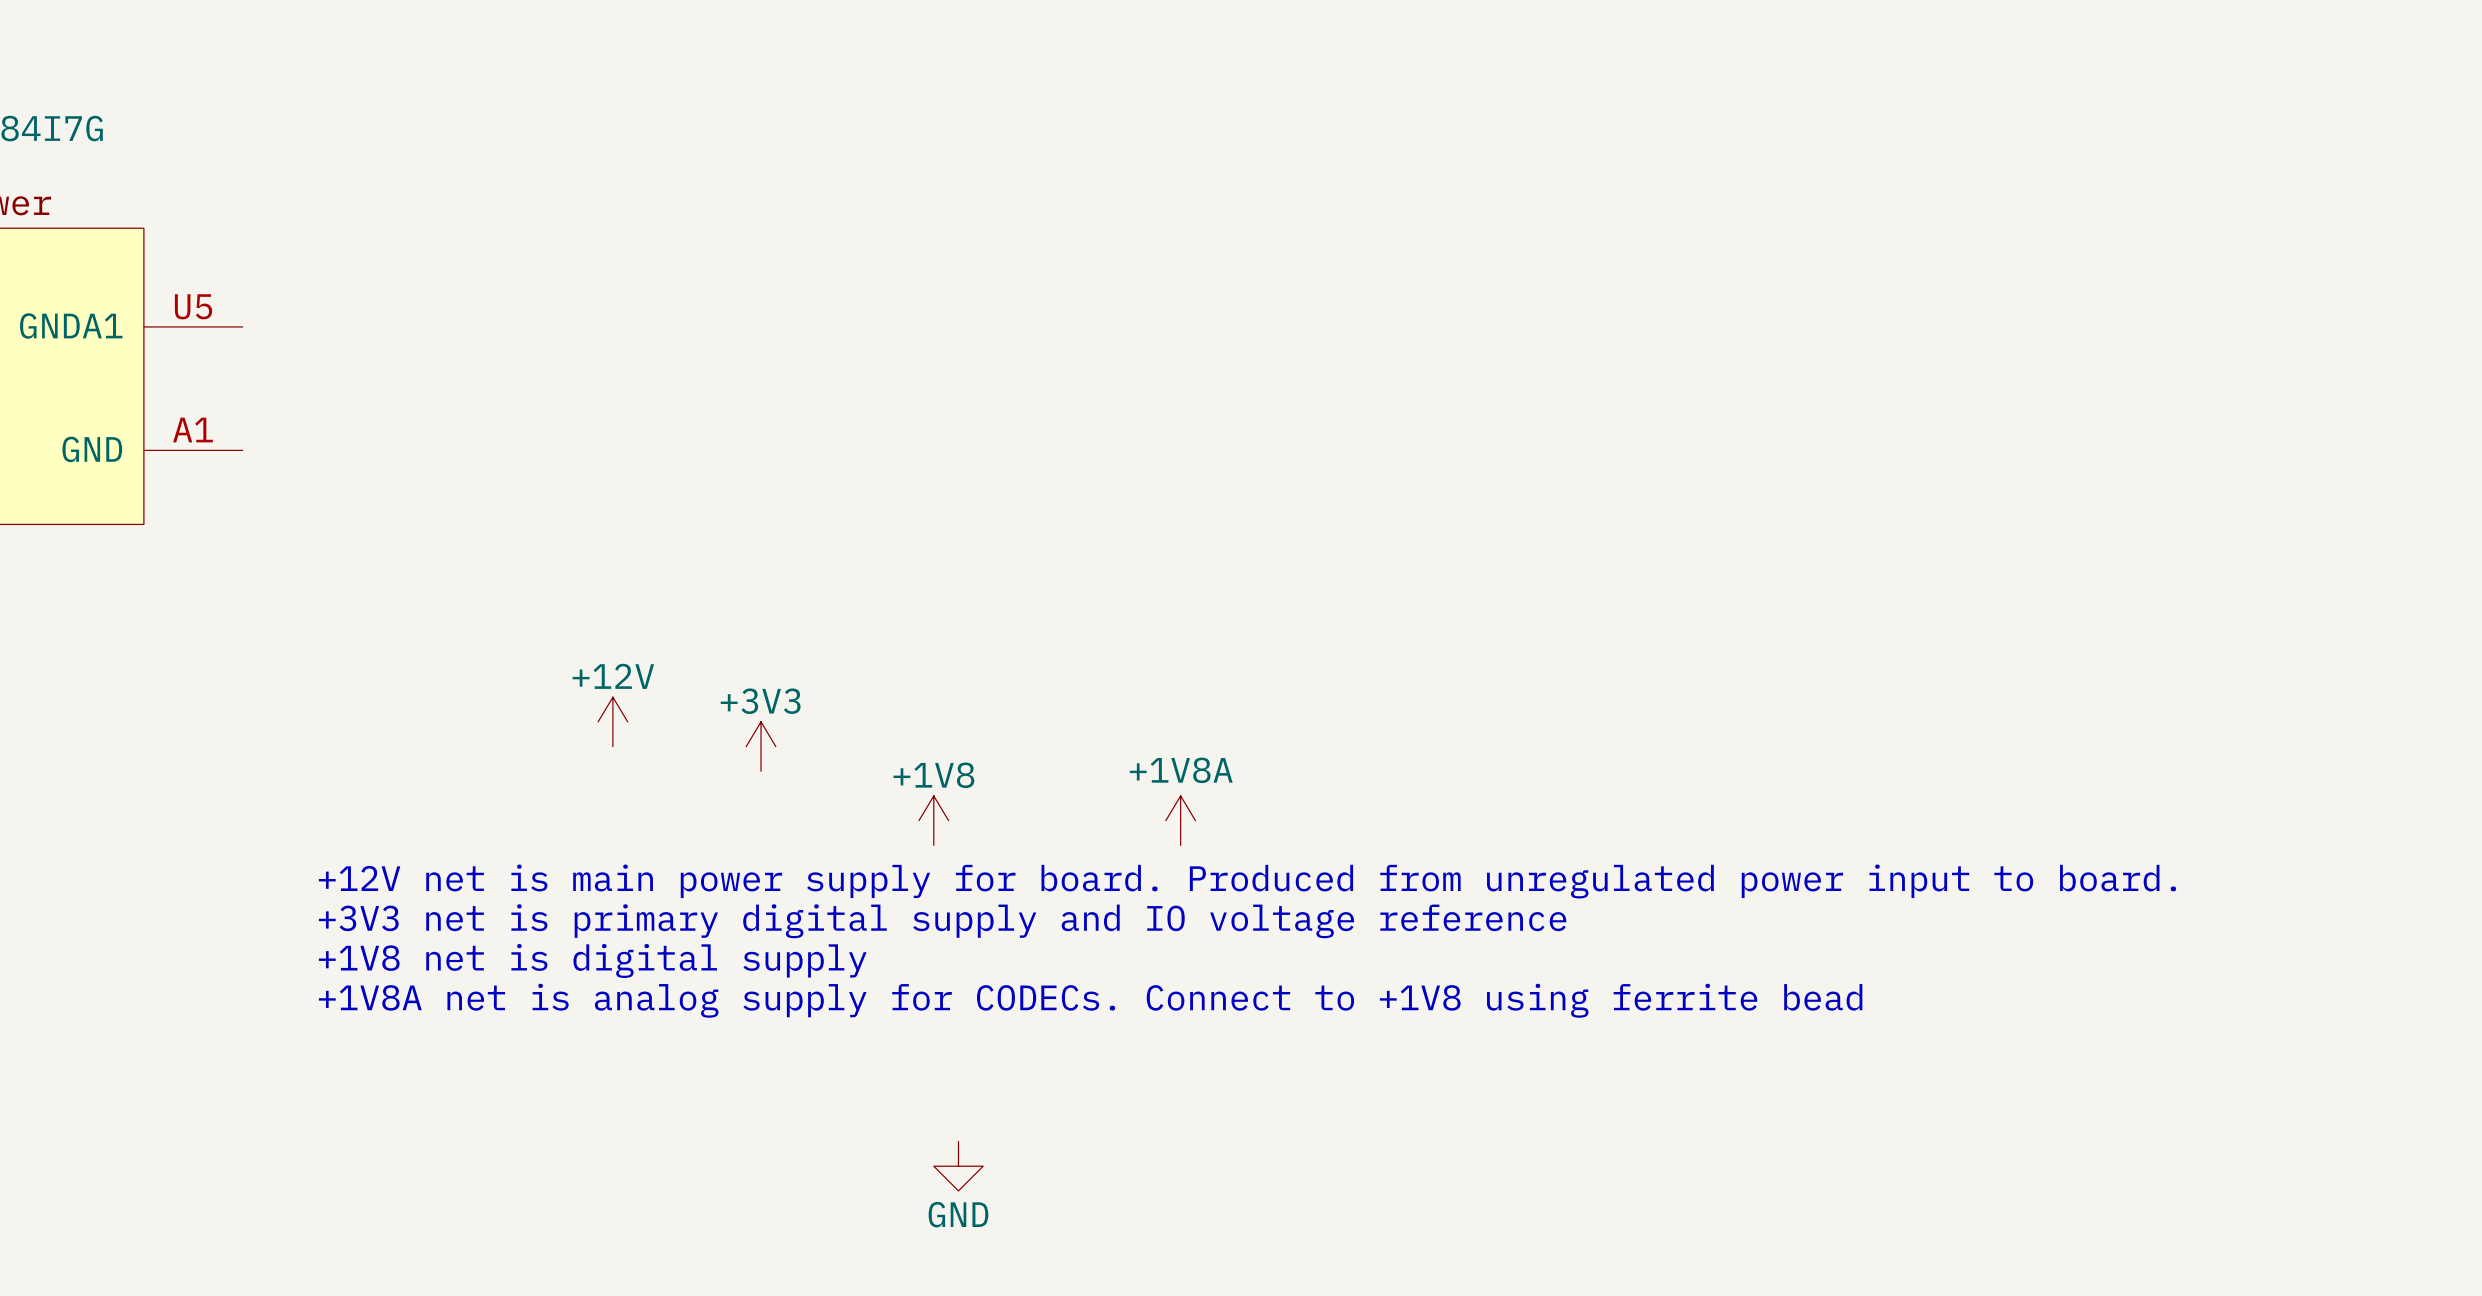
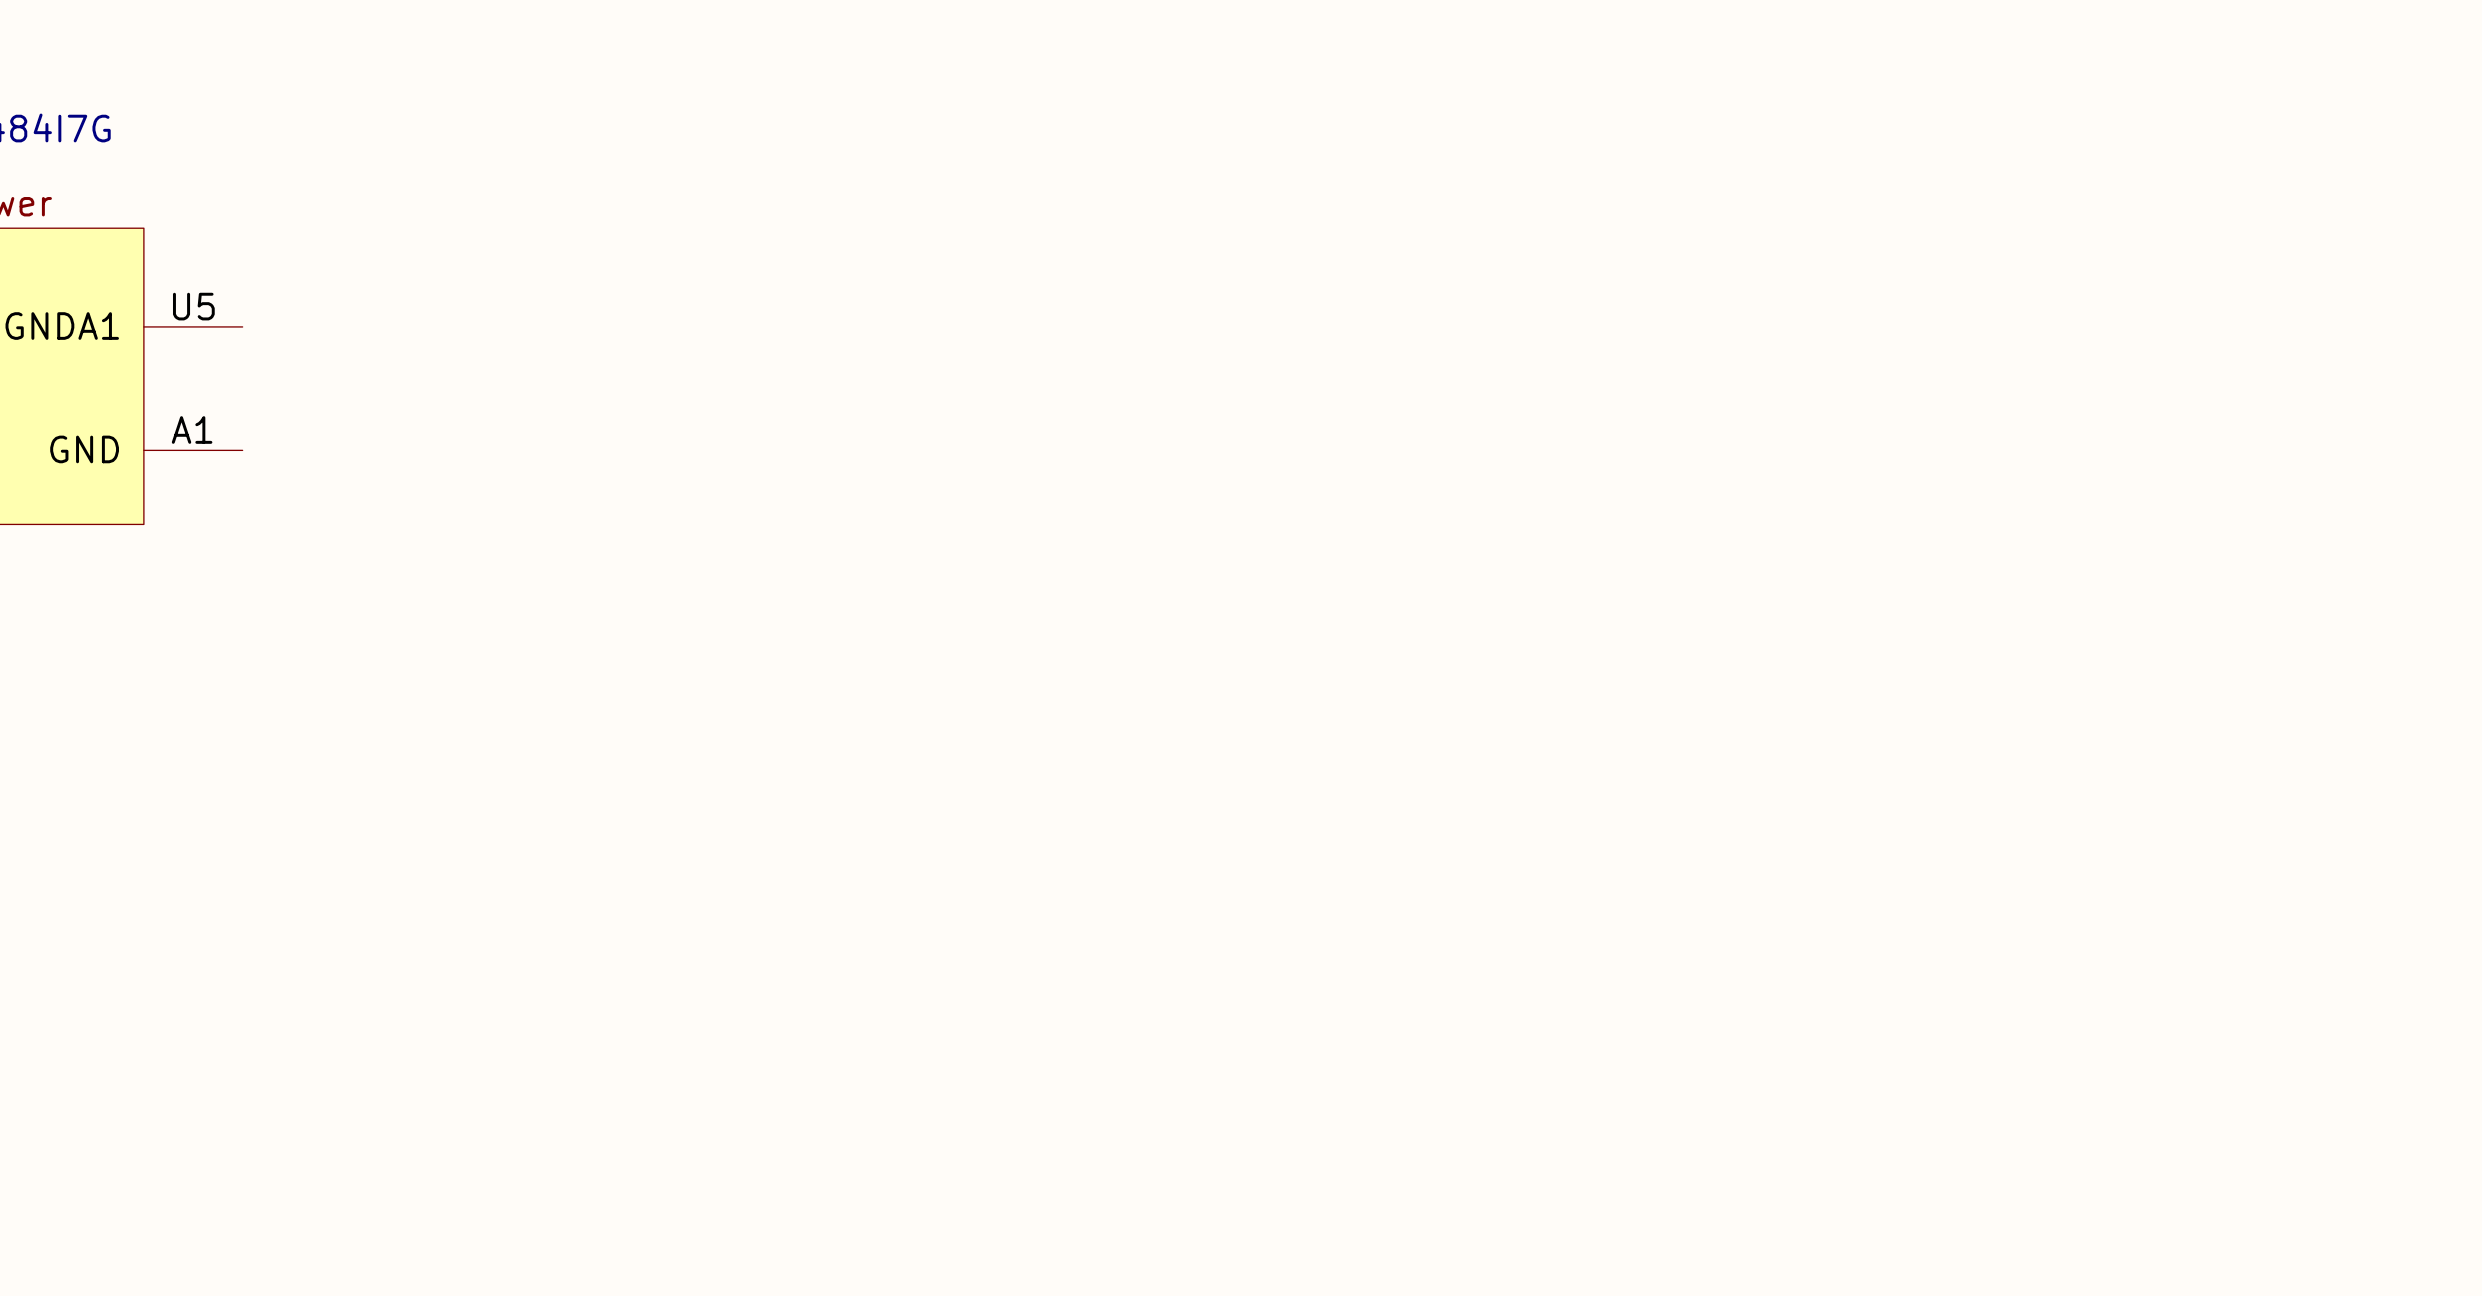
power symbol: +12V (612, 721) -> none
power symbol: +3V3 (761, 746) -> none
power symbol: +1V8 (933, 820) -> none
power symbol: +1V8A (1180, 820) -> none
text: +12V net is main power supply for board. Produced from unregulated power input to board. (1247, 881) -> none
text: +3V3 net is primary digital supply and IO voltage reference (942, 921) -> none
text: +1V8 net is digital supply (592, 961) -> none
text: +1V8A net is analog supply for CODECs. Connect to +1V8 using ferrite bead (1090, 1000) -> none
power symbol: GND (958, 1166) -> none

